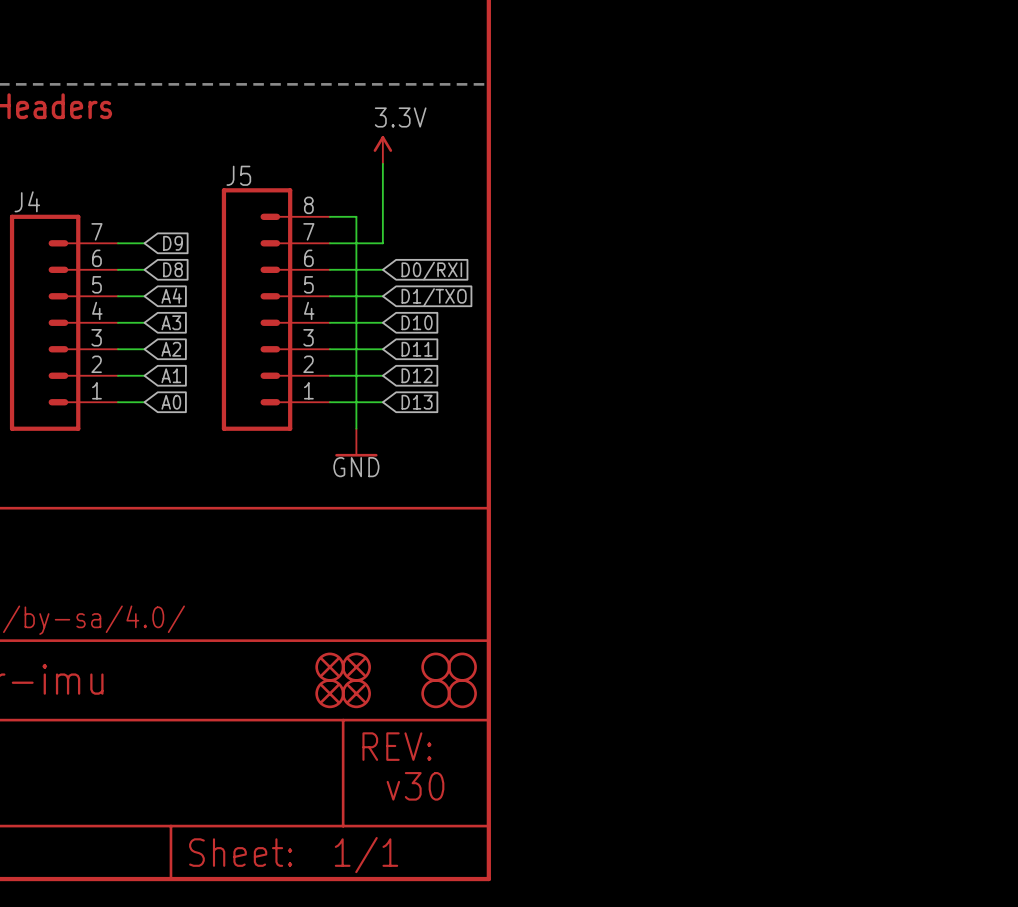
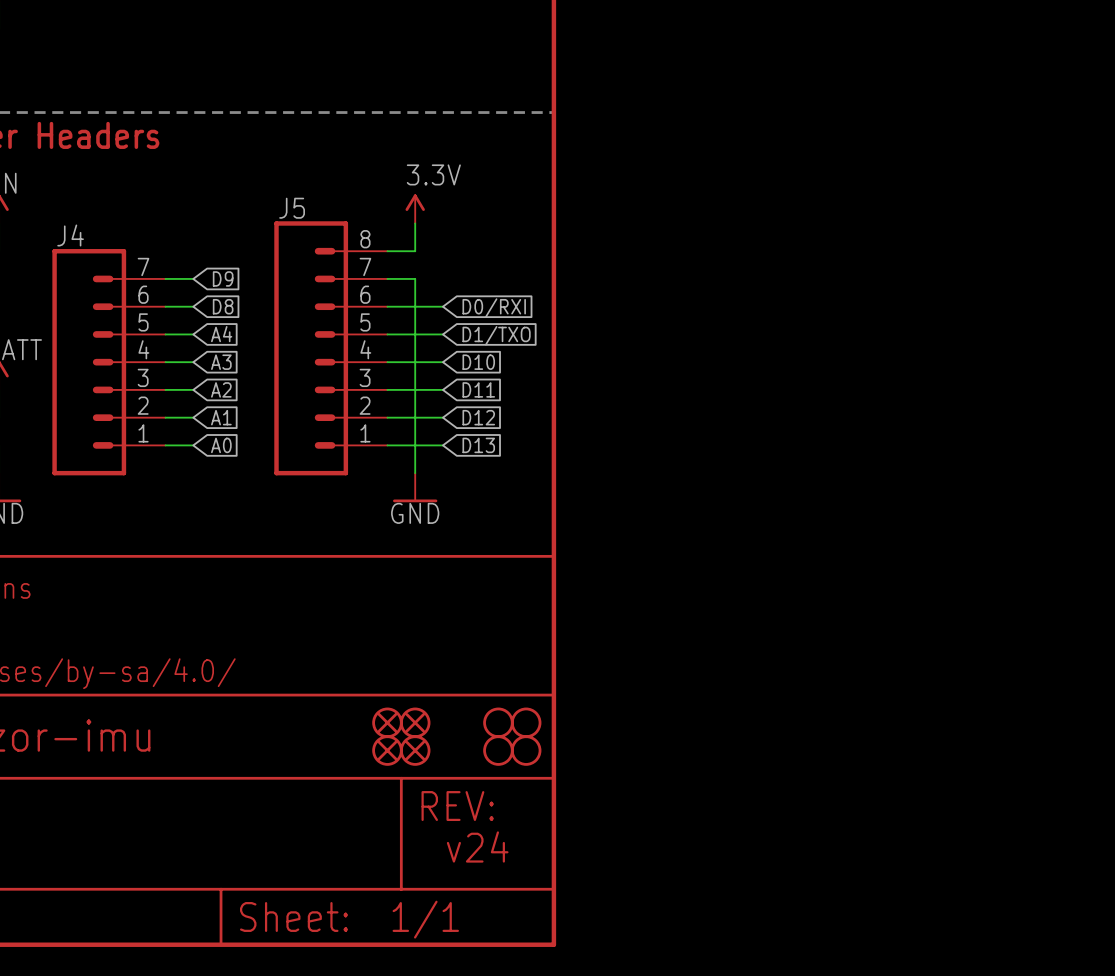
power symbol position: 3.3V (382, 149) -> 3.3V (415, 208)
wire: (382, 163) (382, 243) (356, 243) (356, 216) -> (415, 223) (415, 251)
text: v30 (415, 786) -> v24 (477, 846)

